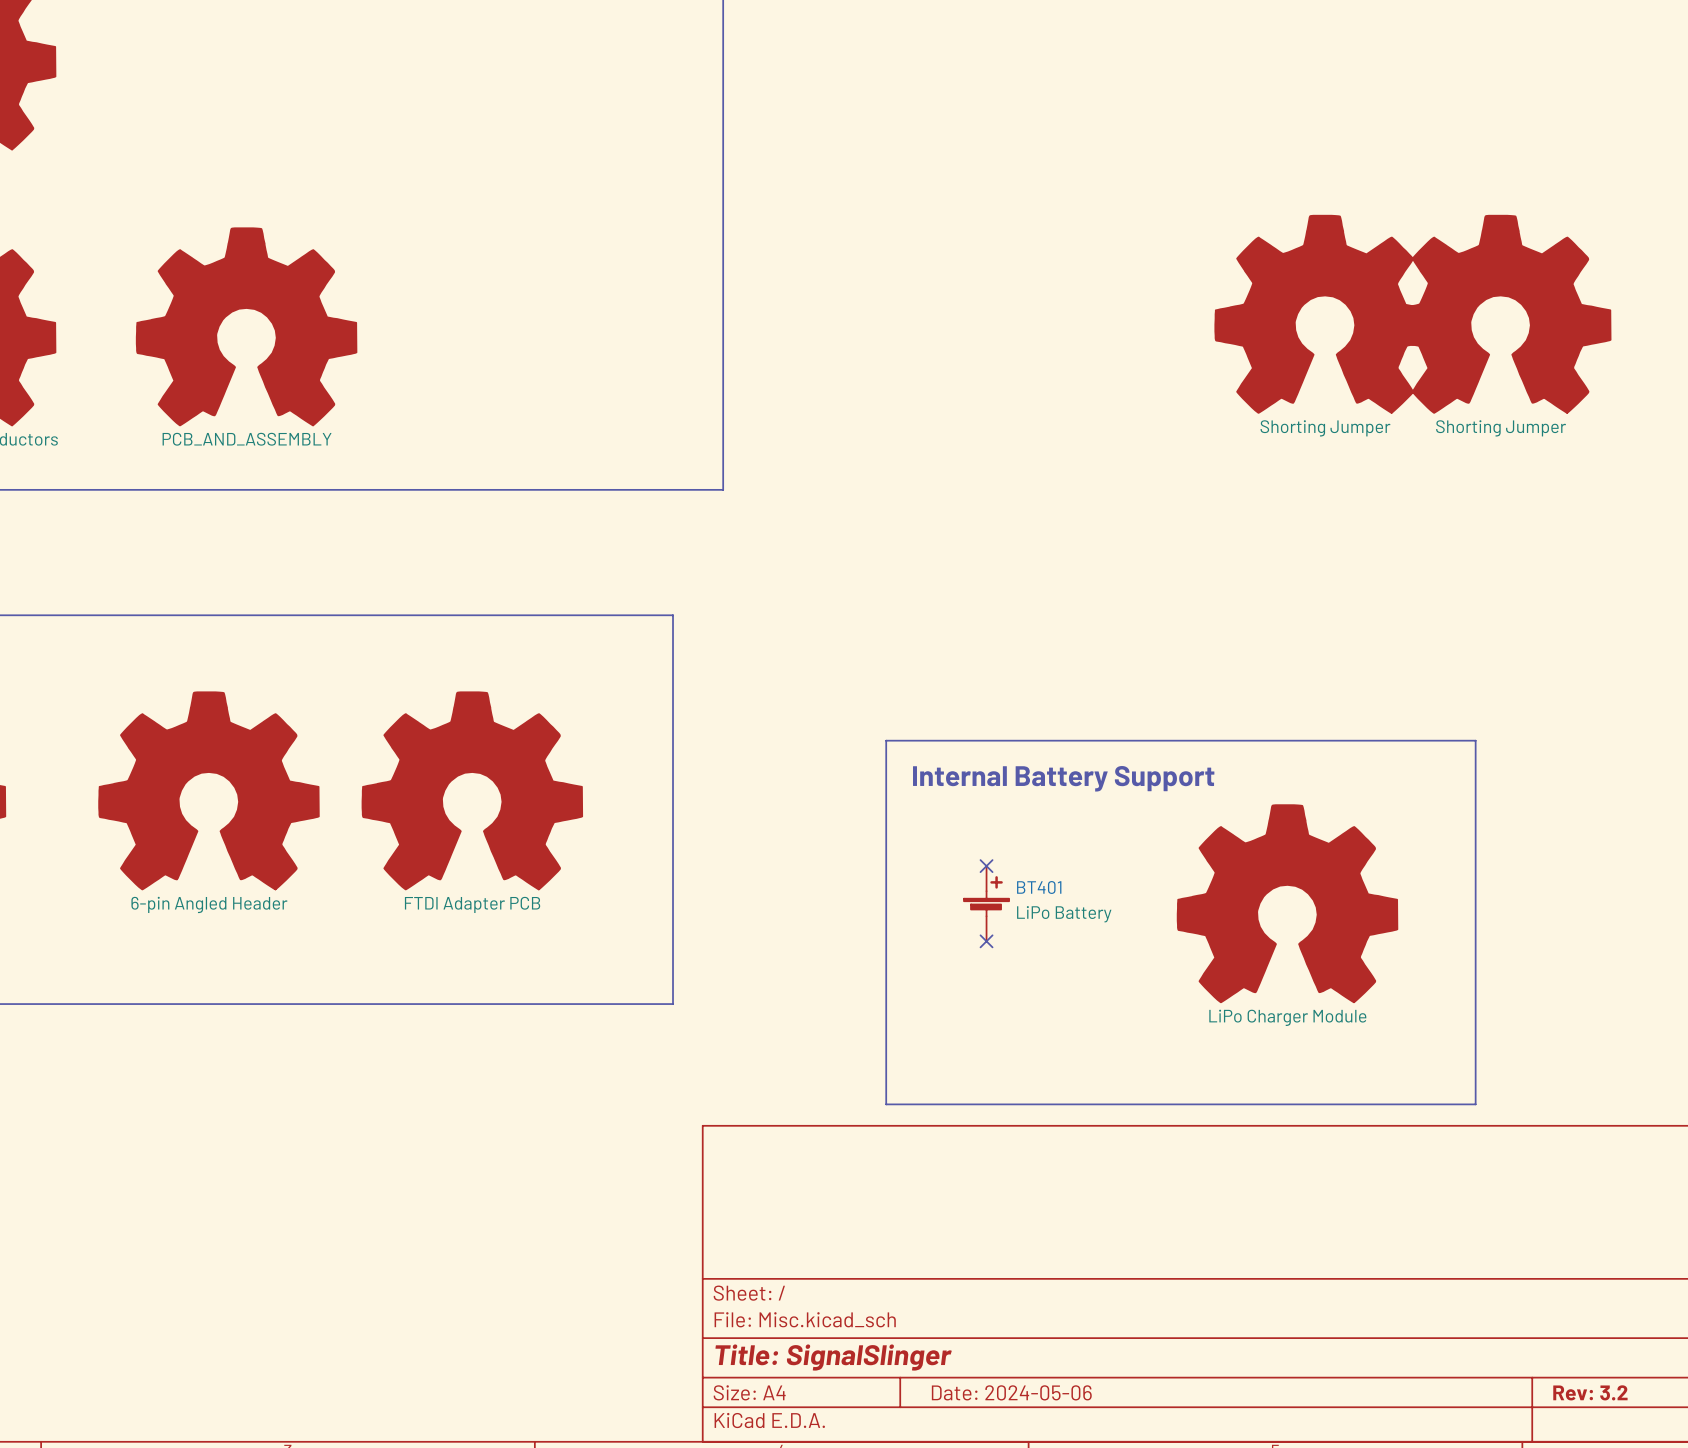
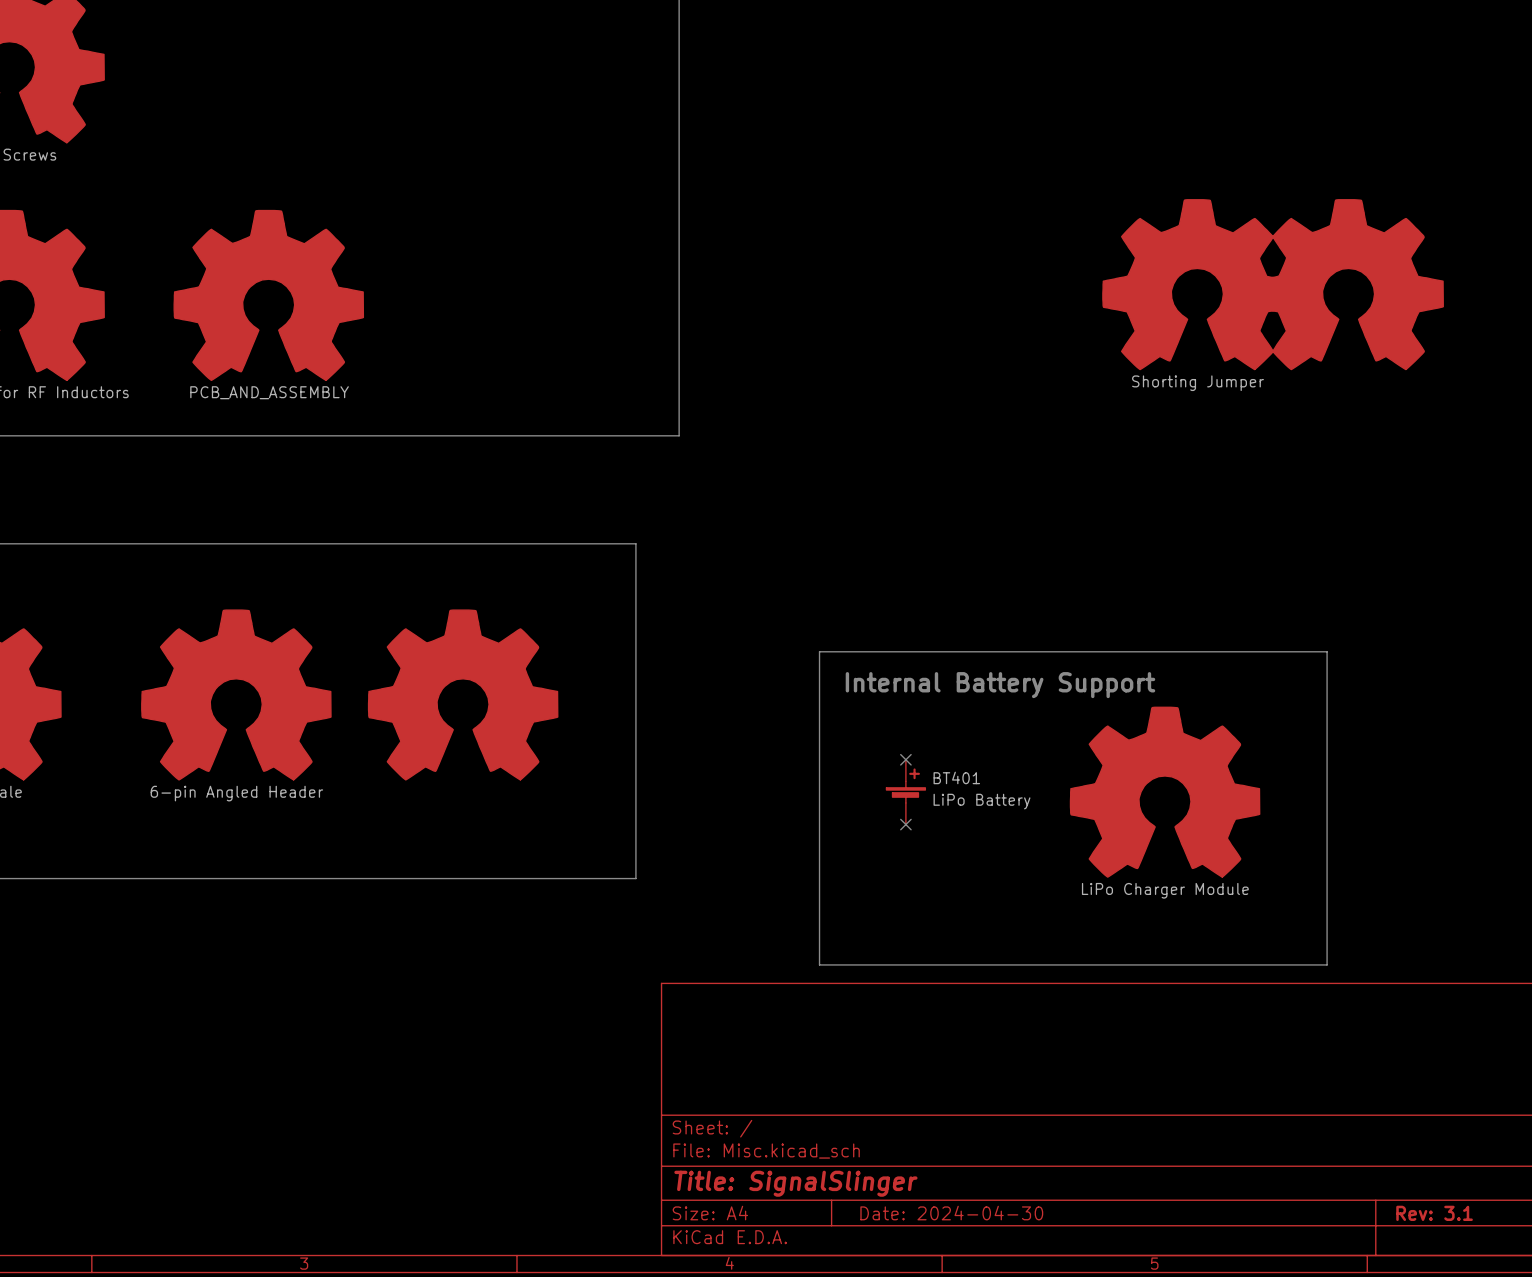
part value: Shorting Jumper (1501, 428) -> none
part value: FTDI Adapter PCB (472, 904) -> none
title block: Date: 2024-05-06 (1011, 1392) -> Date: 2024-04-30 (951, 1213)
title block: Rev: 3.2 (1590, 1392) -> Rev: 3.1 (1434, 1213)

